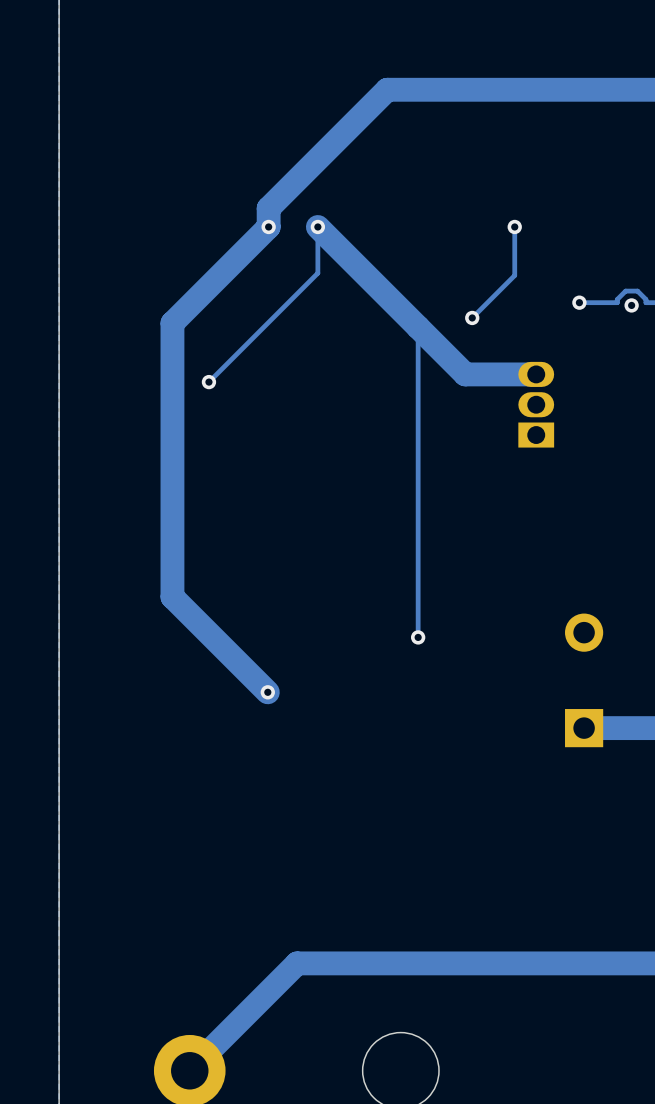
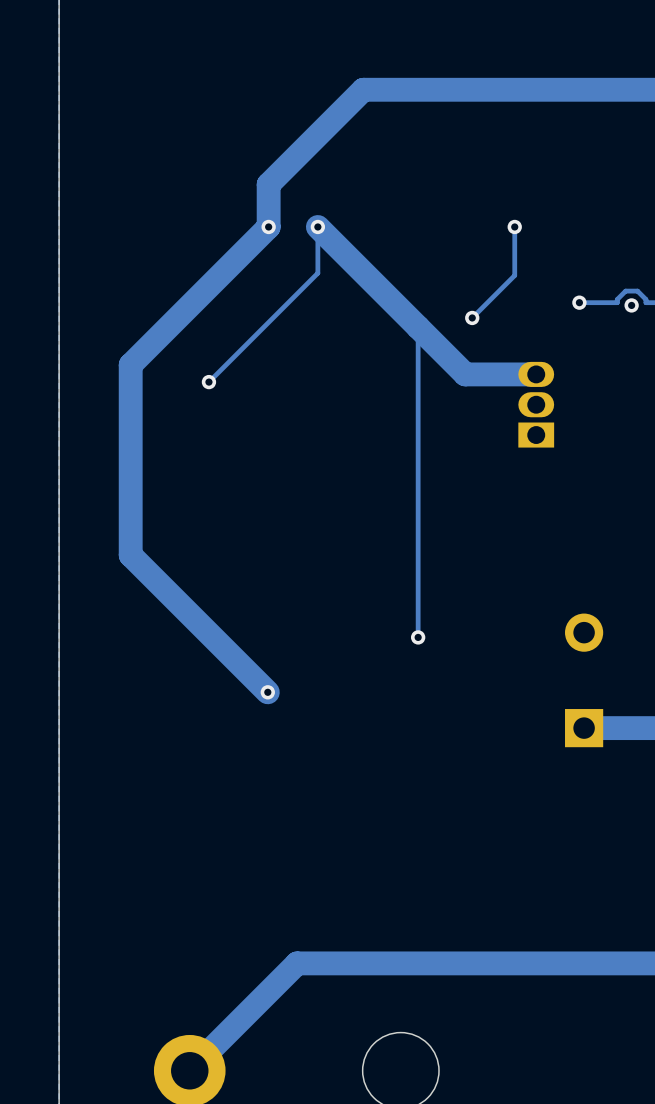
track: (387, 89) (268, 208) -> (387, 89) (363, 89) (268, 184) (268, 208)
track: (172, 323) (172, 596) -> (172, 323) (130, 364) (130, 555) (172, 596)

